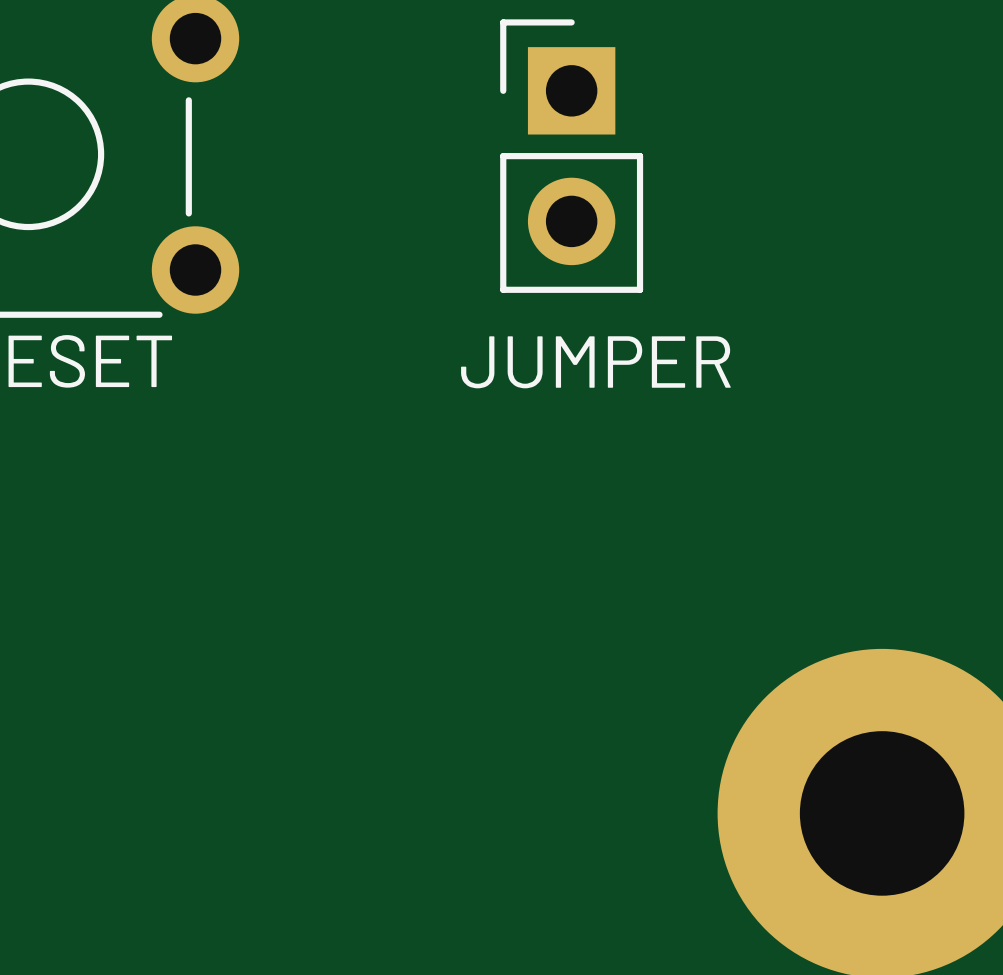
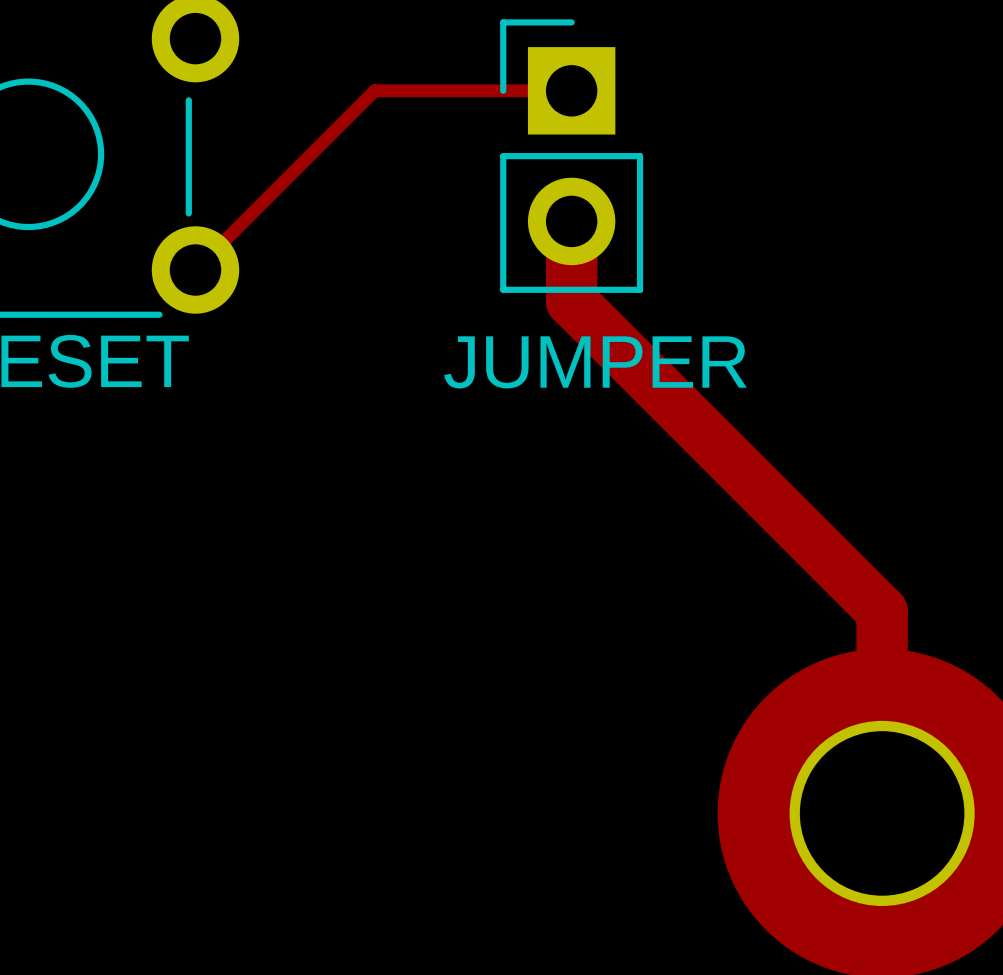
track: none -> (571, 90) (374, 90) (195, 270)
track: none -> (571, 221) (571, 301) (882, 611) (882, 813)

